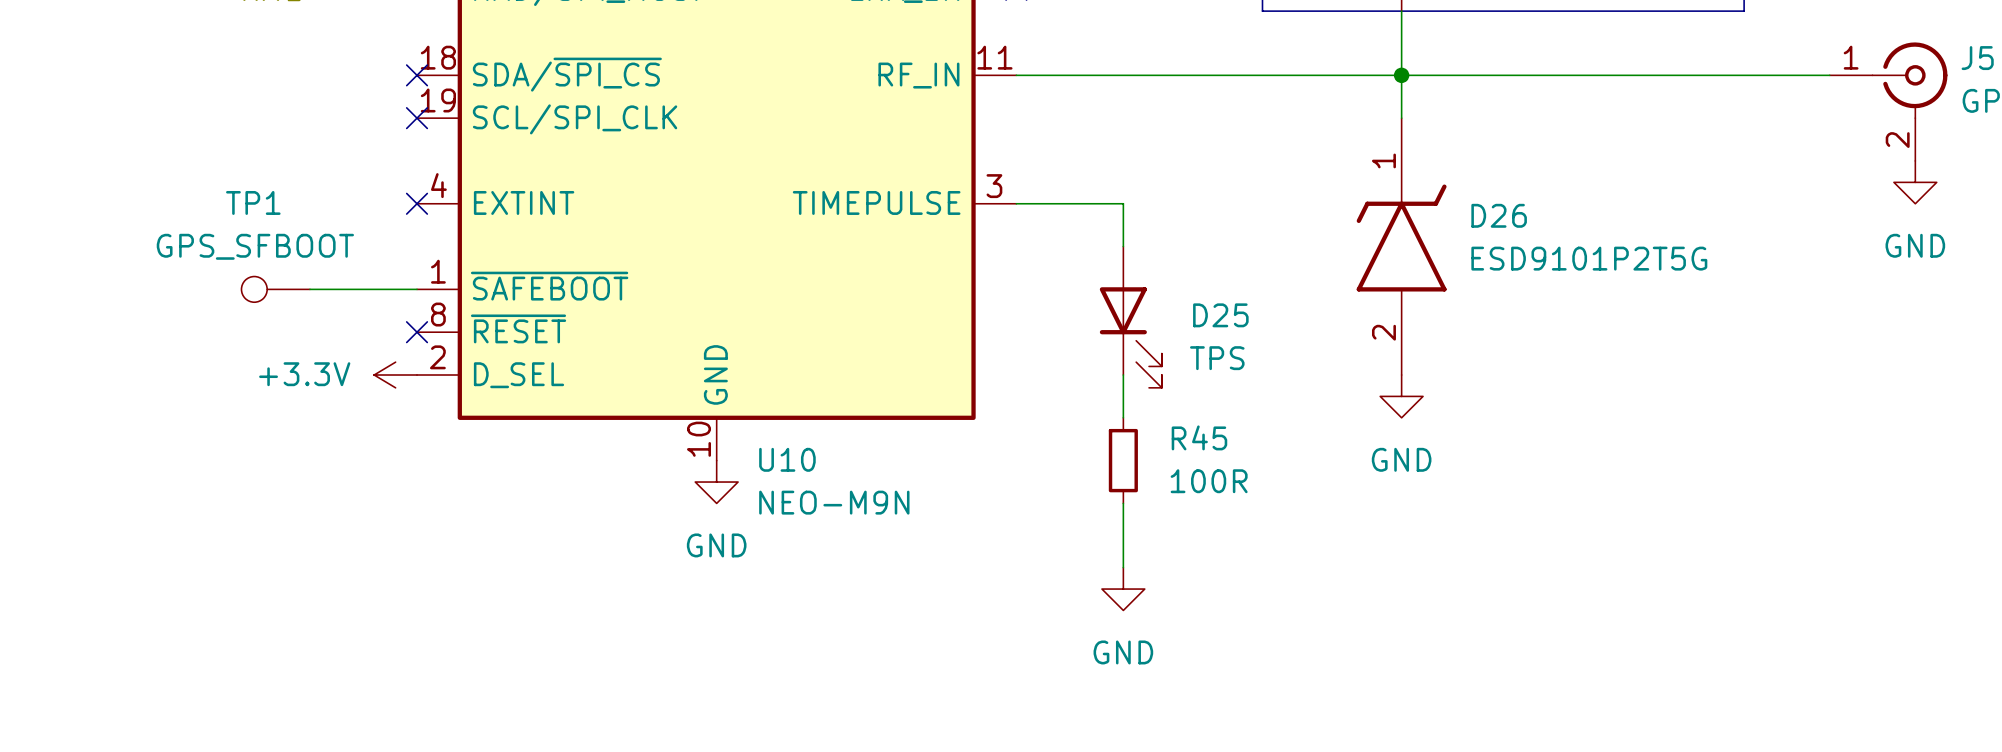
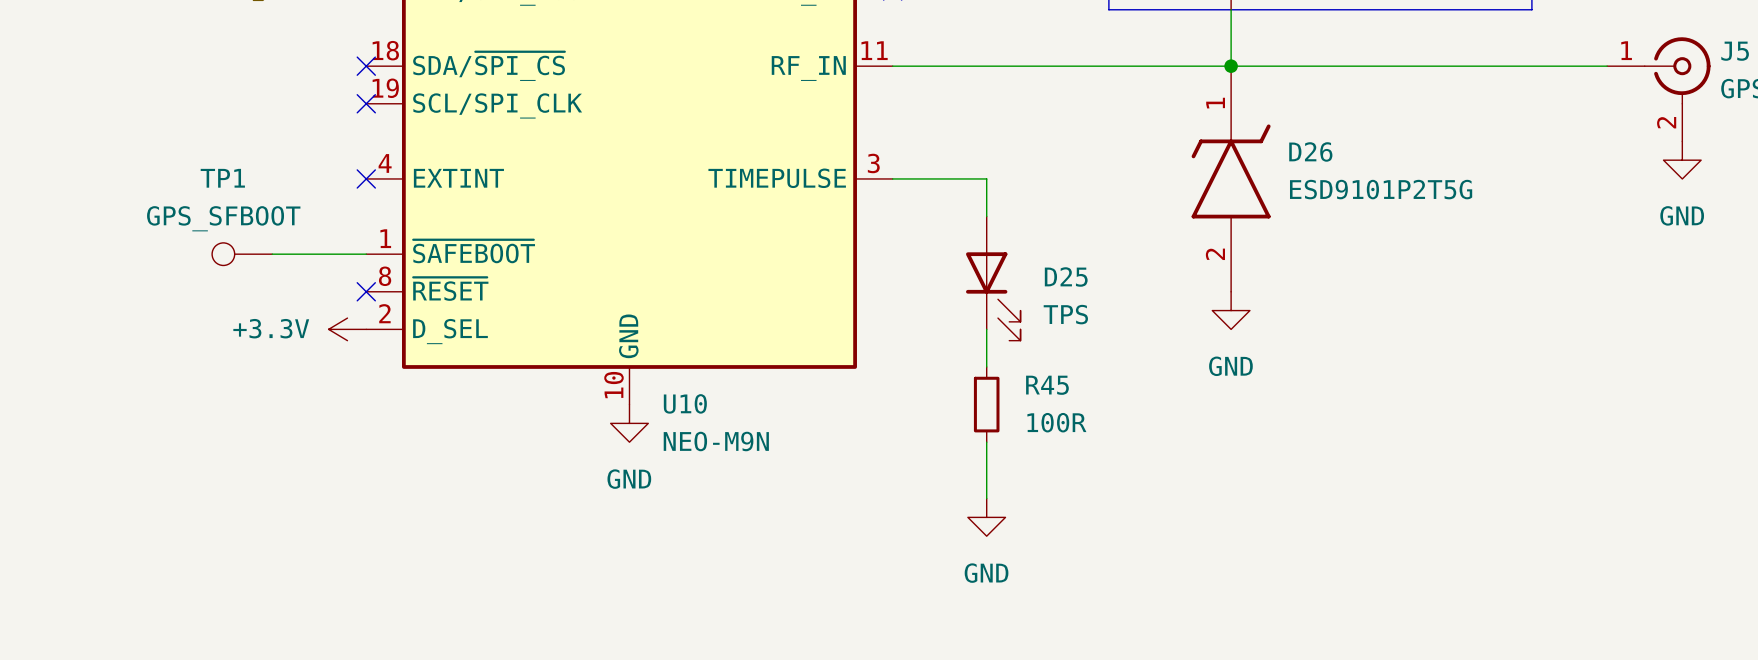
D26 position: (1401, 246) -> (1231, 178)
power symbol position: GND (1401, 396) -> GND (1231, 310)

